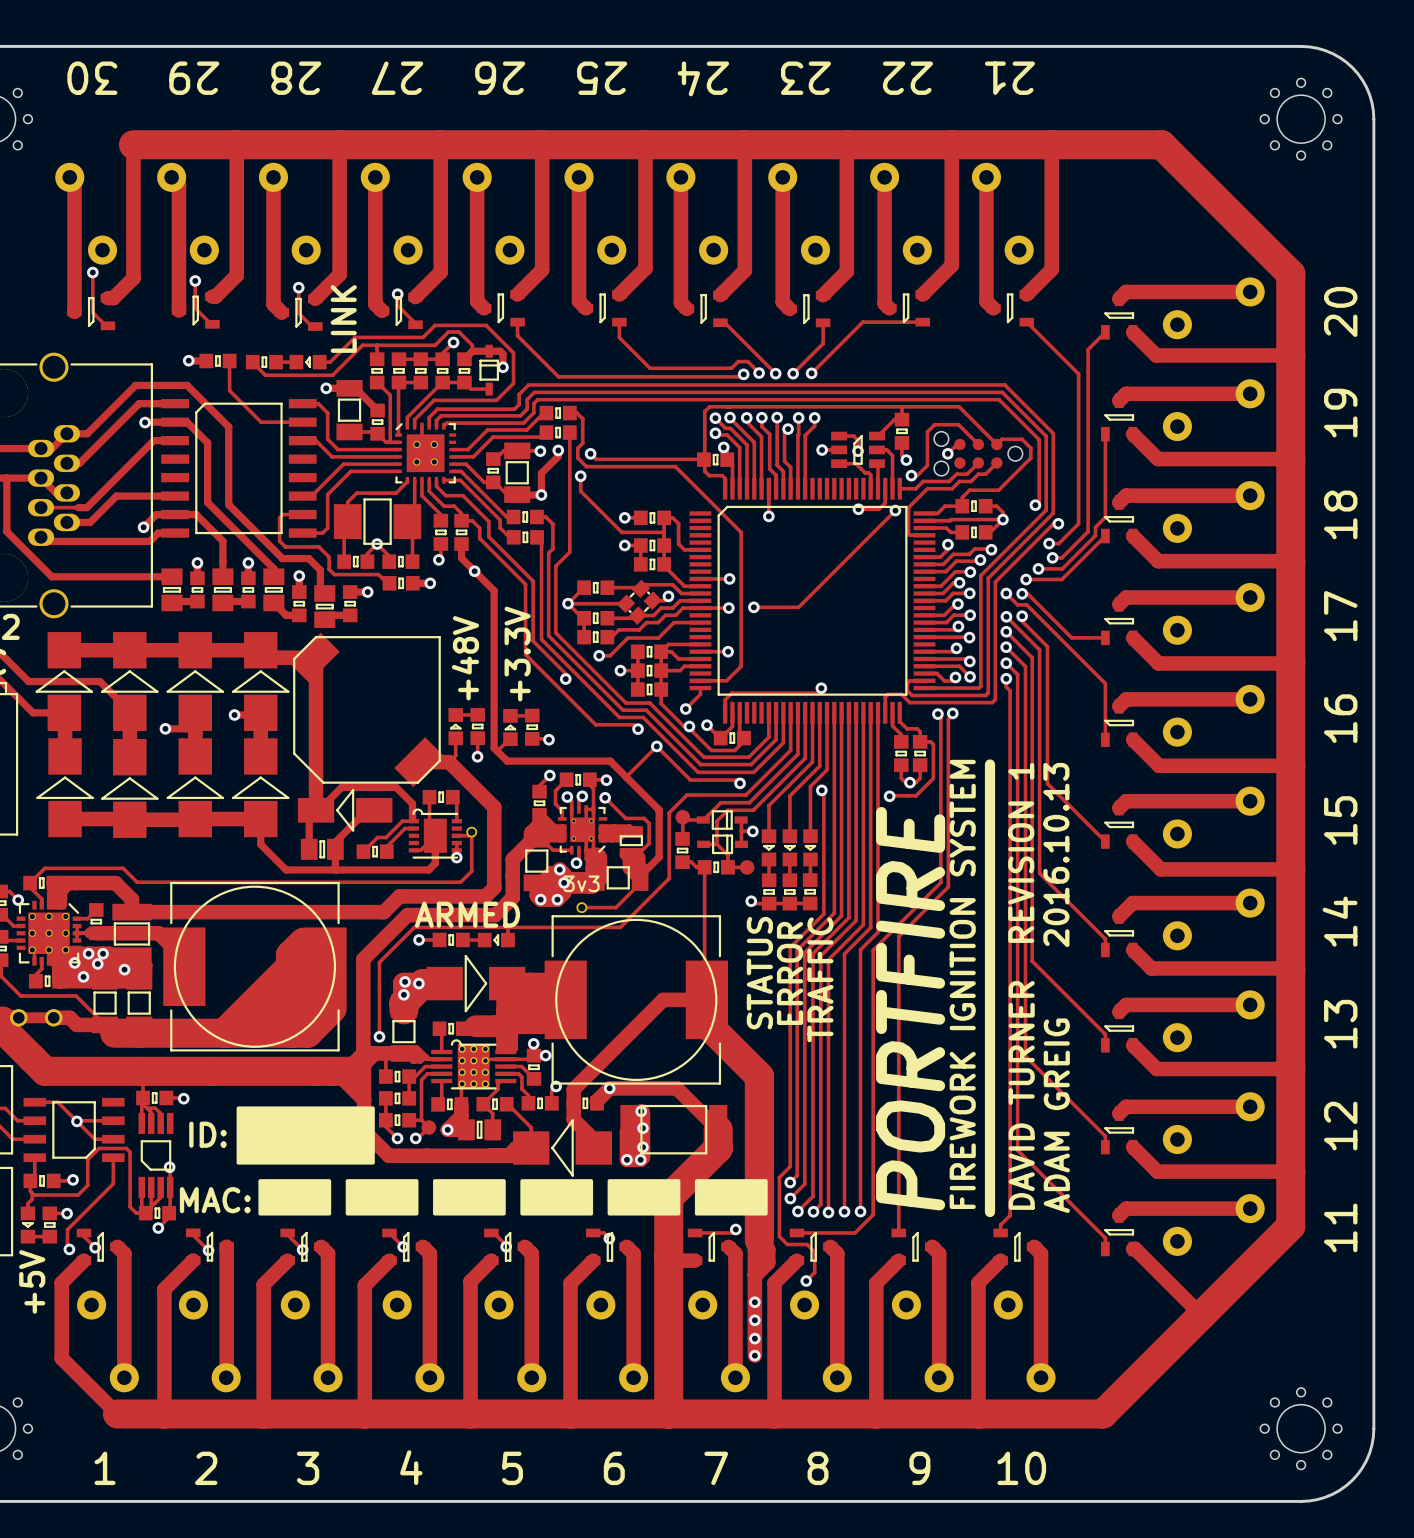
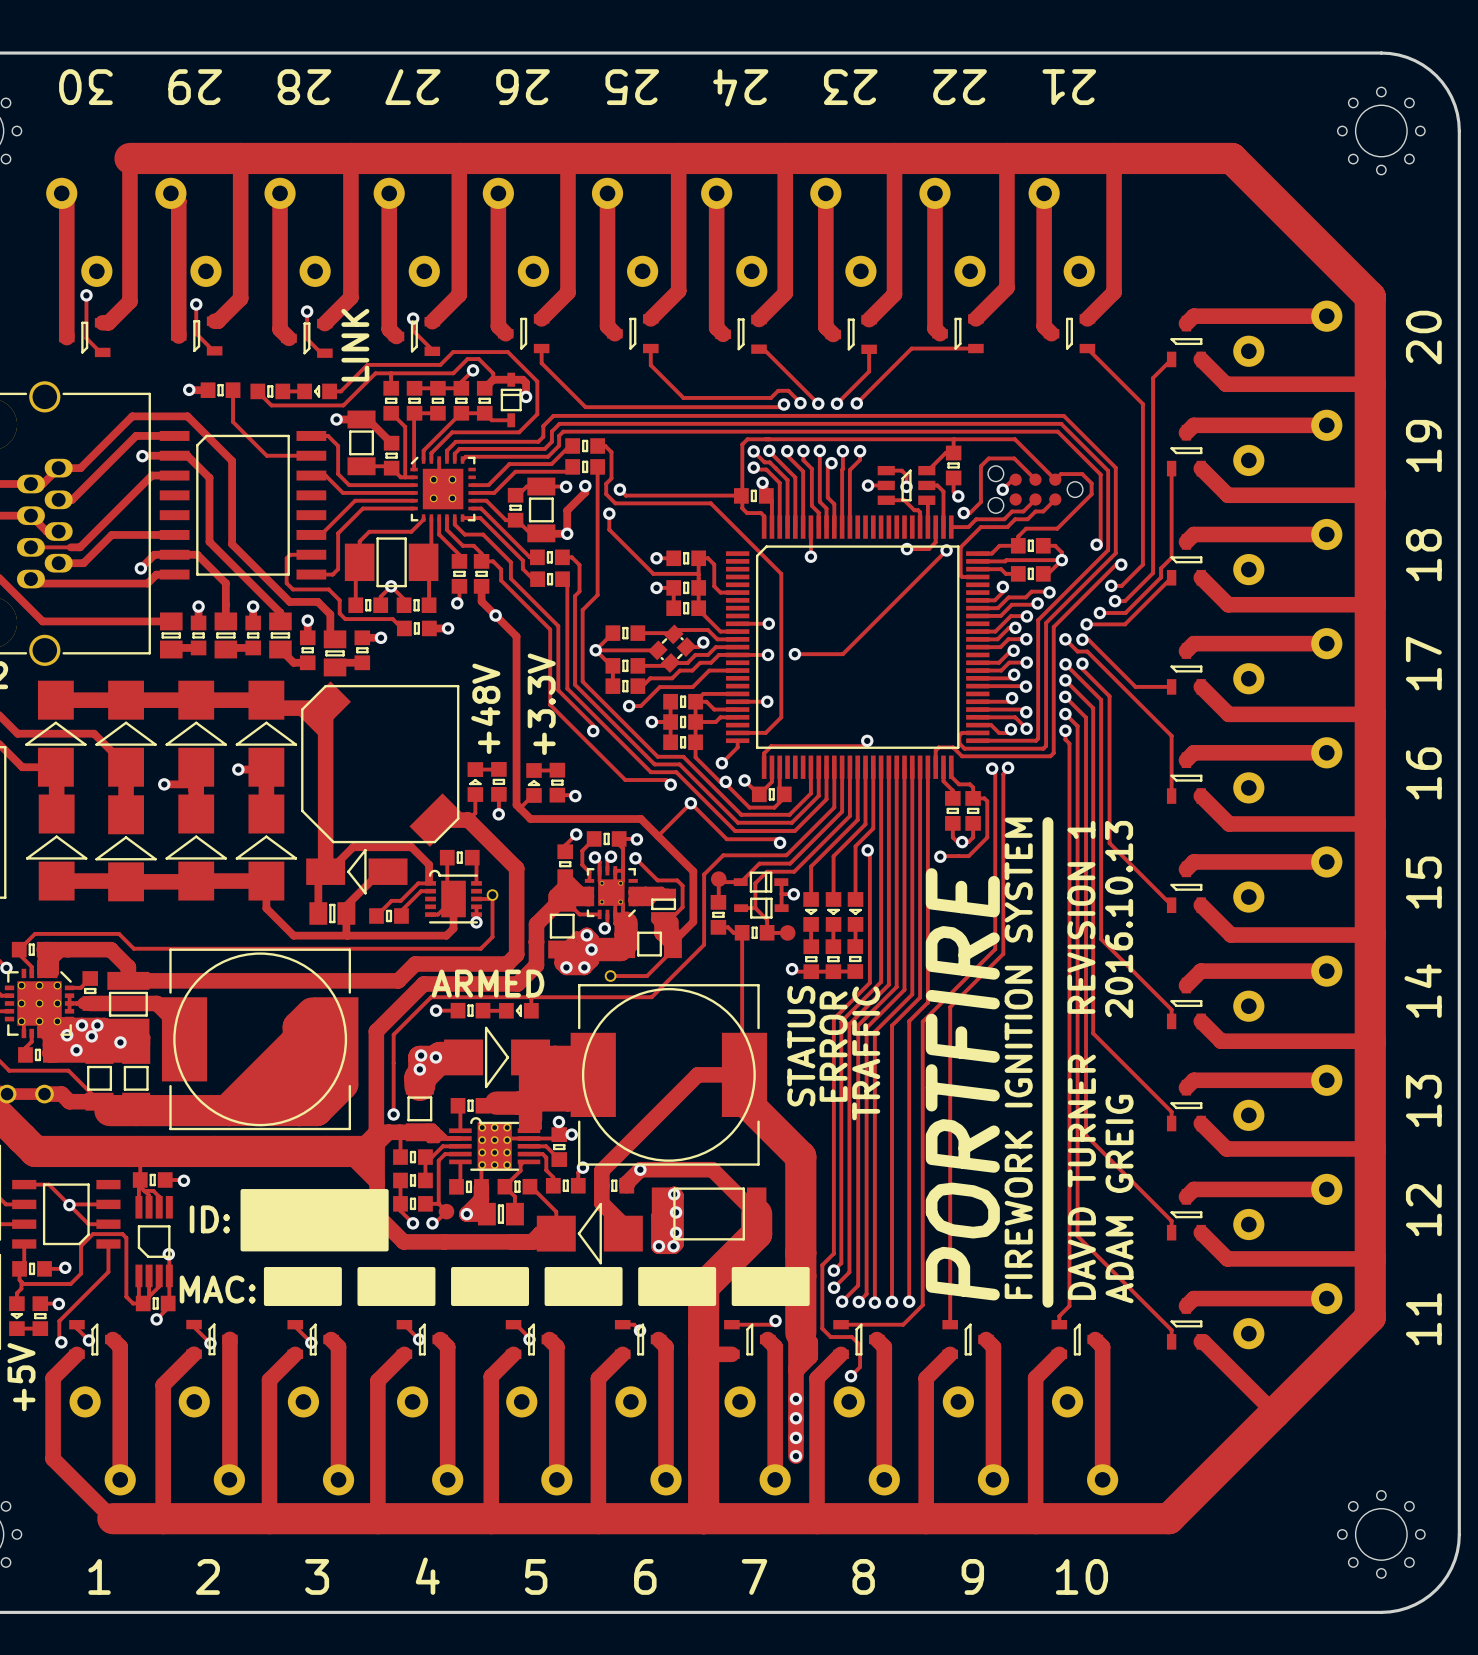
part value: 3v3 (581, 883) -> none

